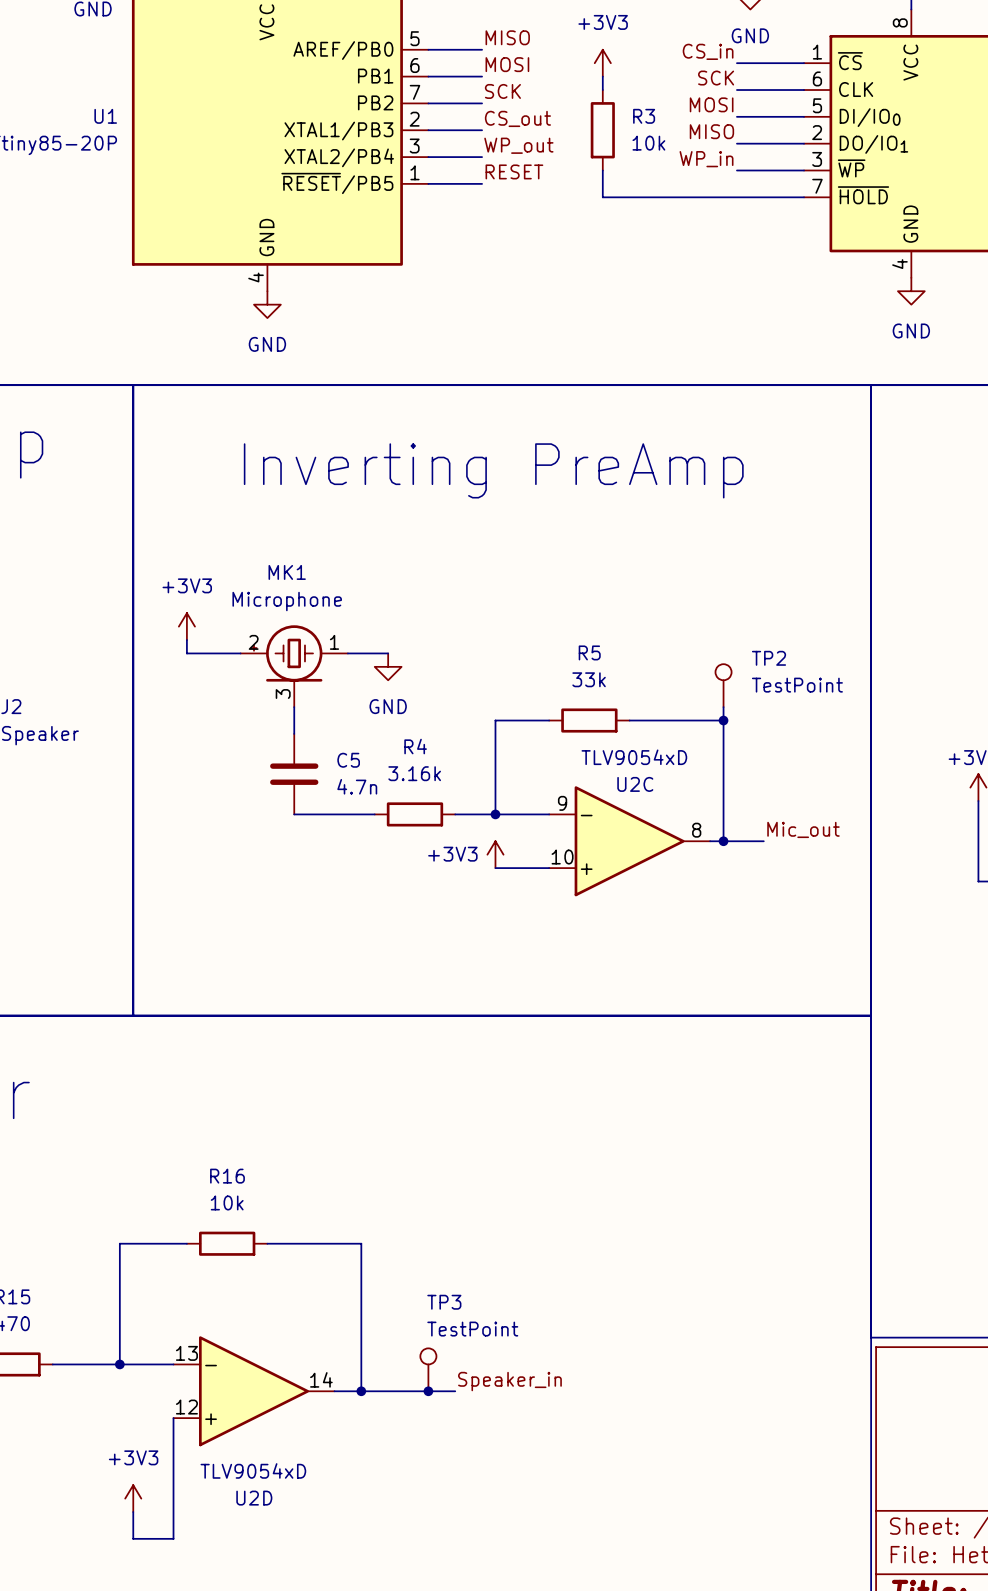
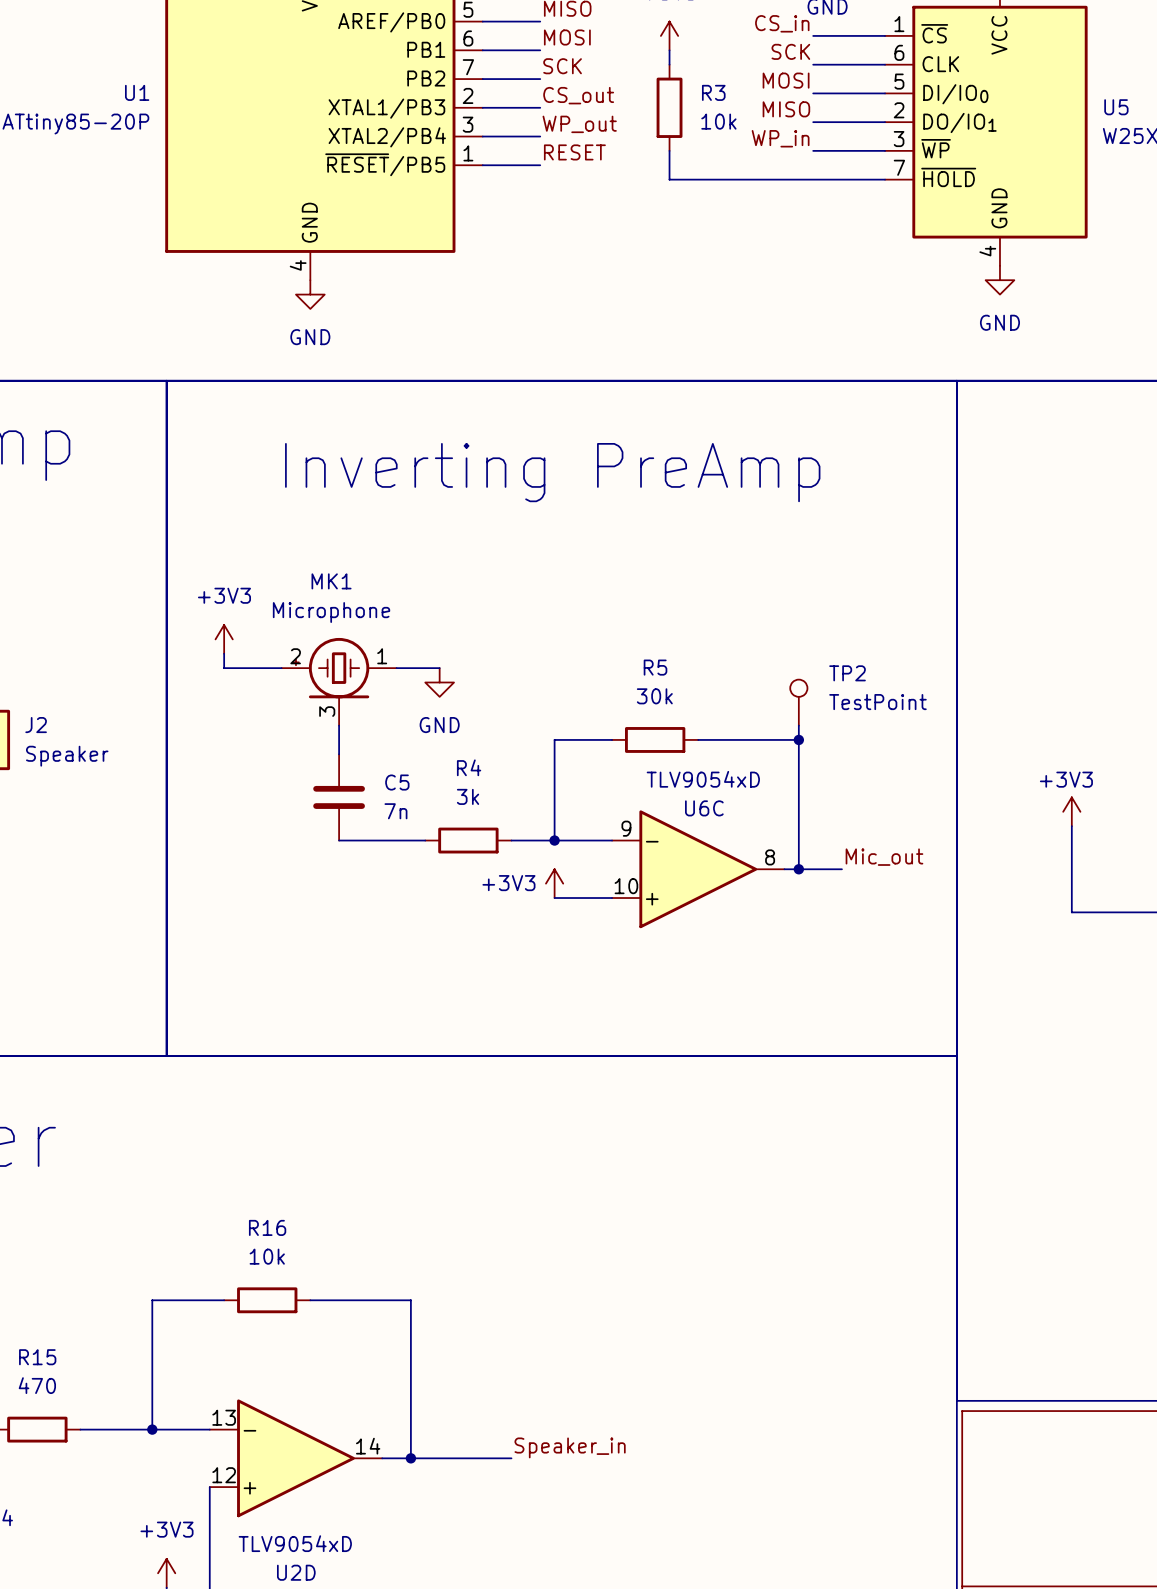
R5 value: 33k (589, 679) -> 30k (654, 696)
R4 value: 3.16k (414, 773) -> 3k (468, 796)
U2C name: U2C (635, 784) -> U6C (704, 808)
C5 value: 4.7n (357, 786) -> 7n (395, 811)
TP3: TestPoint (428, 1369) -> none
junction: (428, 1391) -> none

